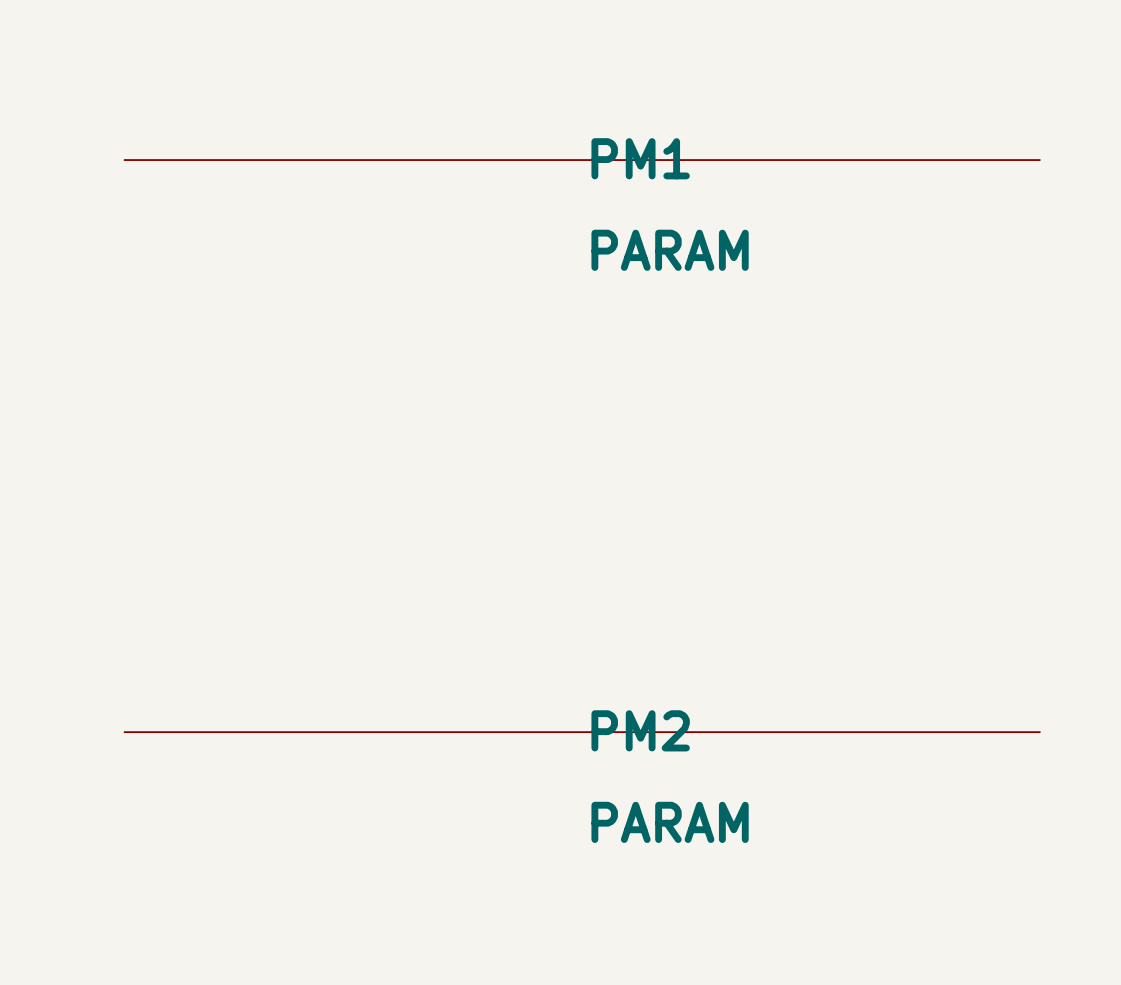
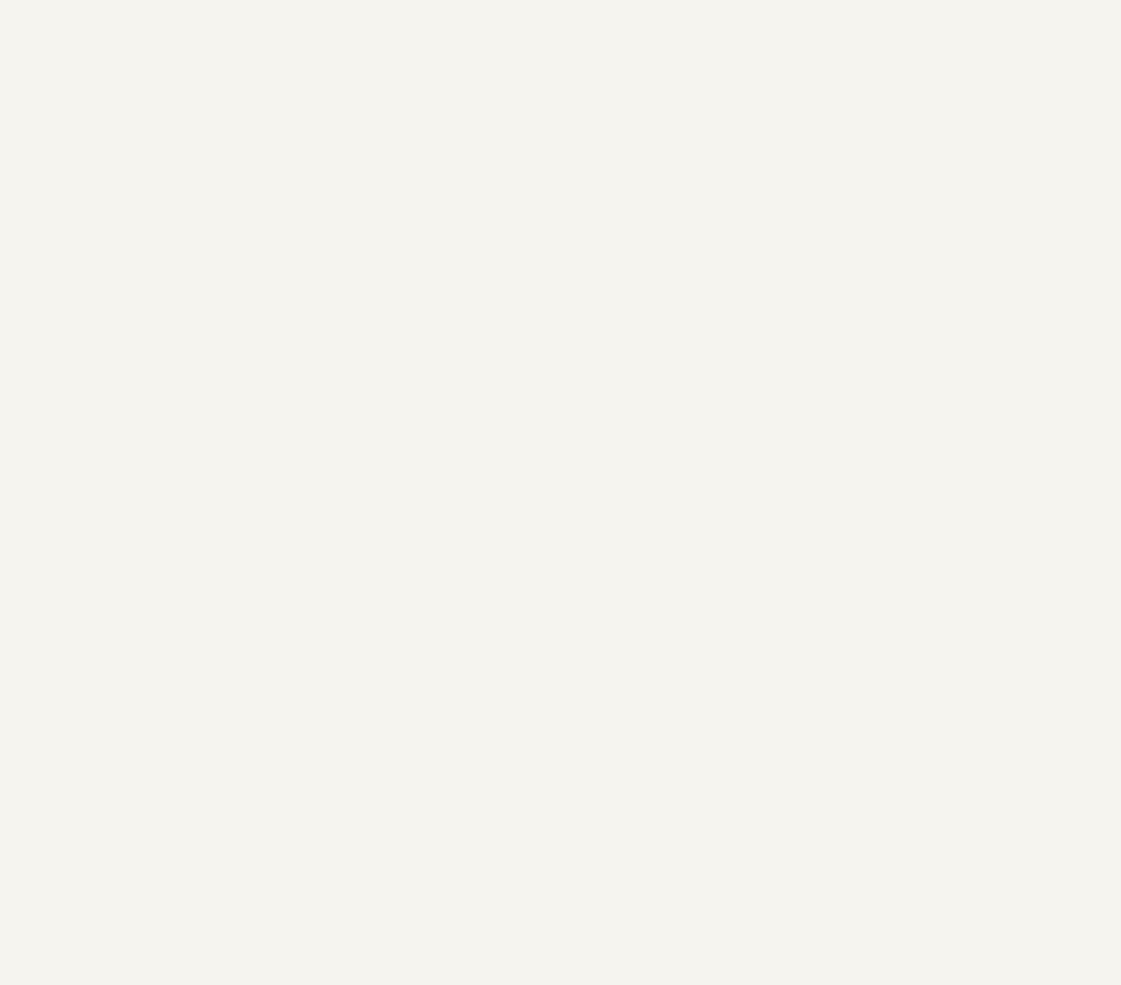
PM1: PARAM (582, 160) -> none
PM2: PARAM (582, 732) -> none

